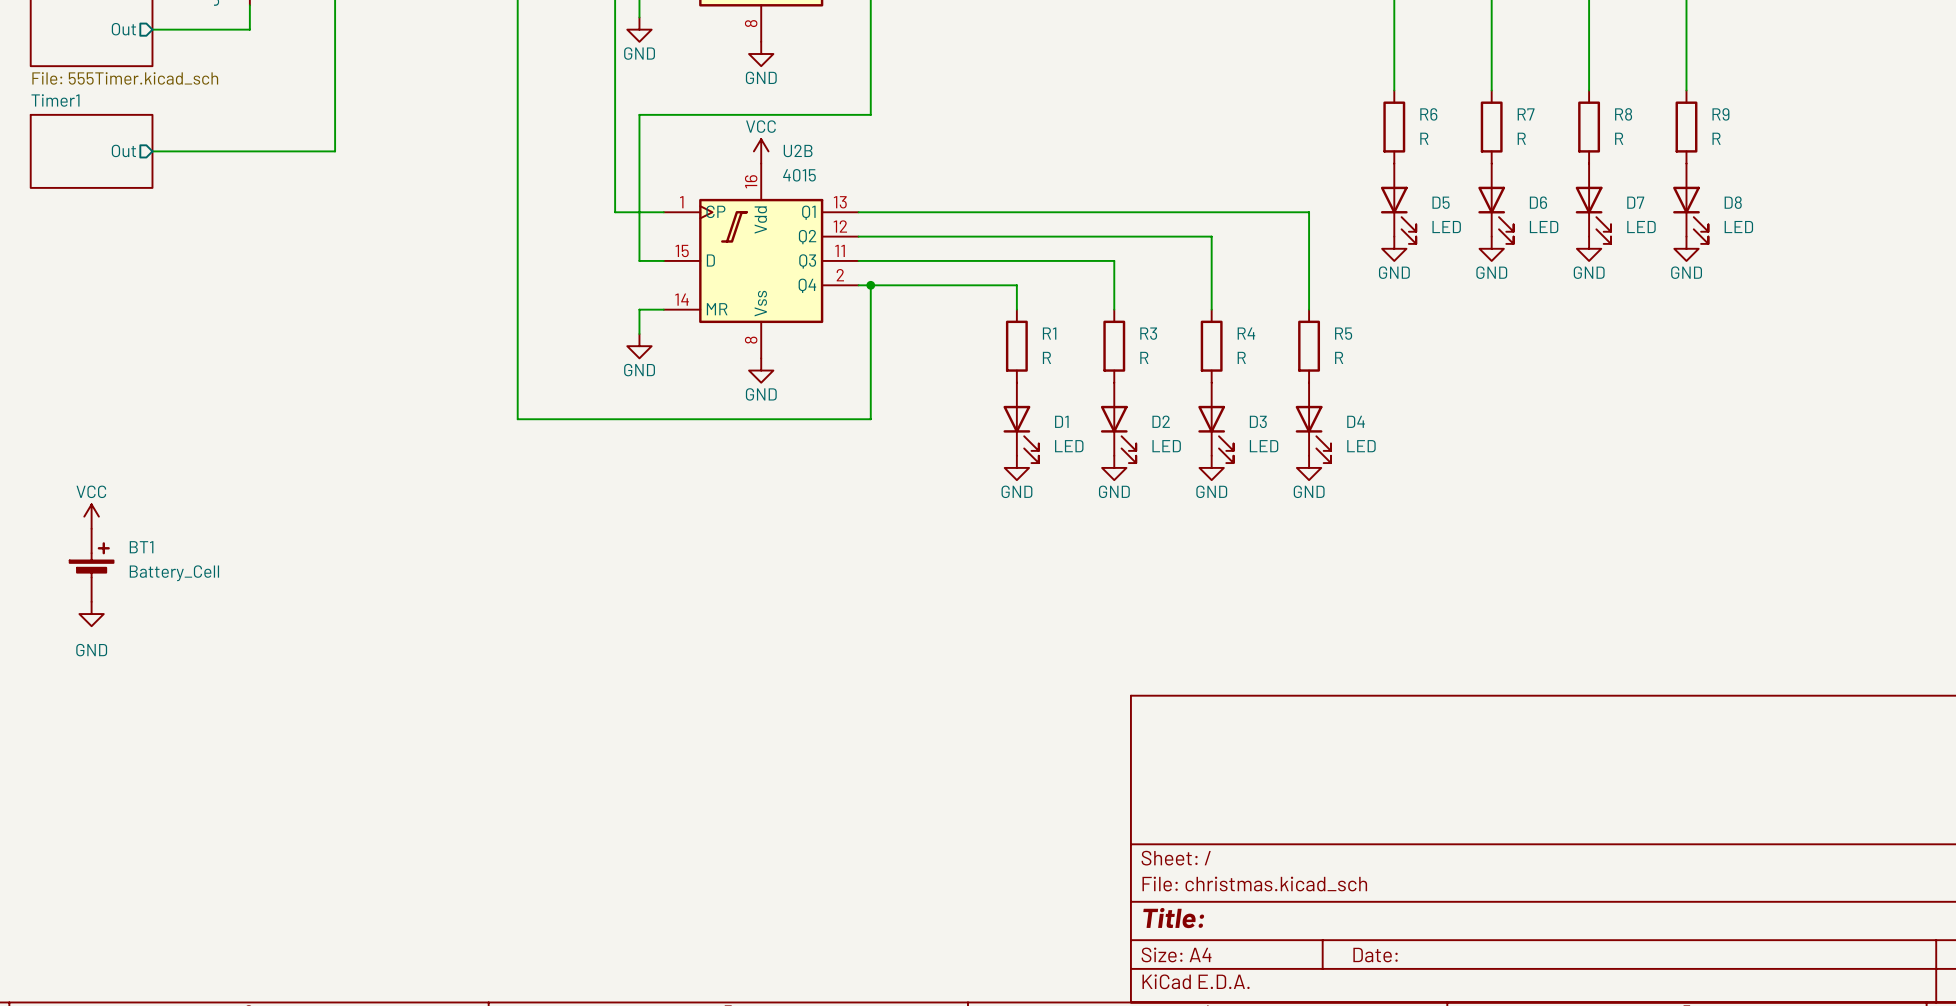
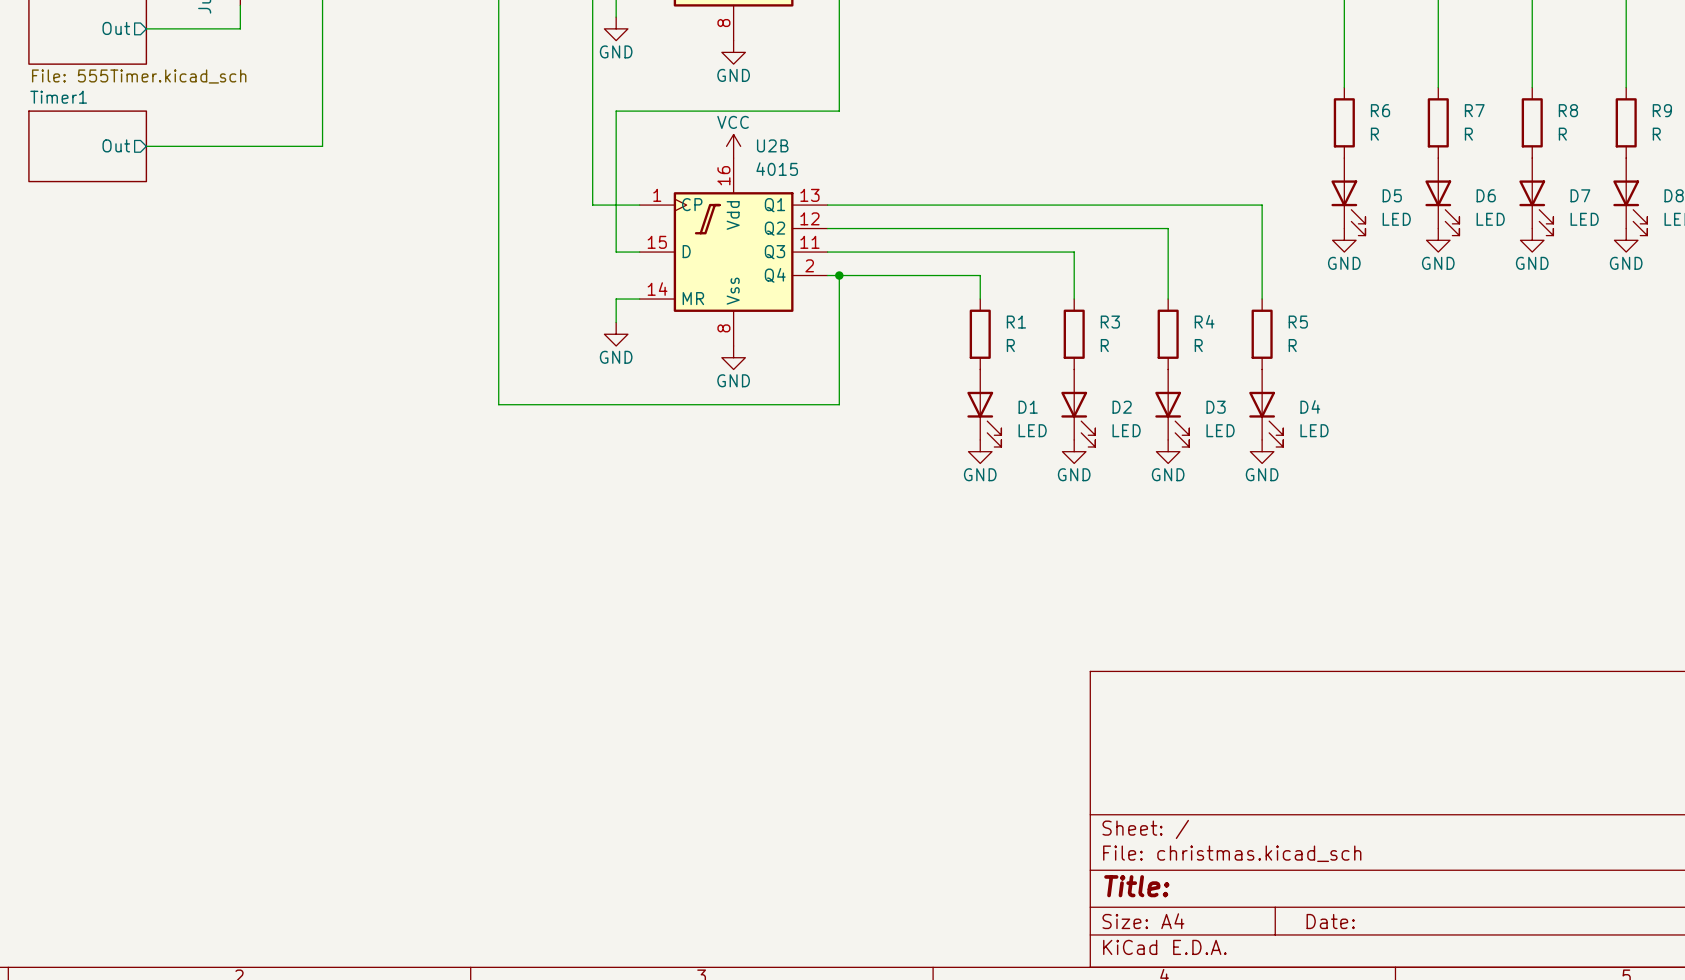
power symbol: VCC (91, 516) -> none
BT1: Battery_Cell (91, 565) -> none
power symbol: GND (91, 614) -> none

